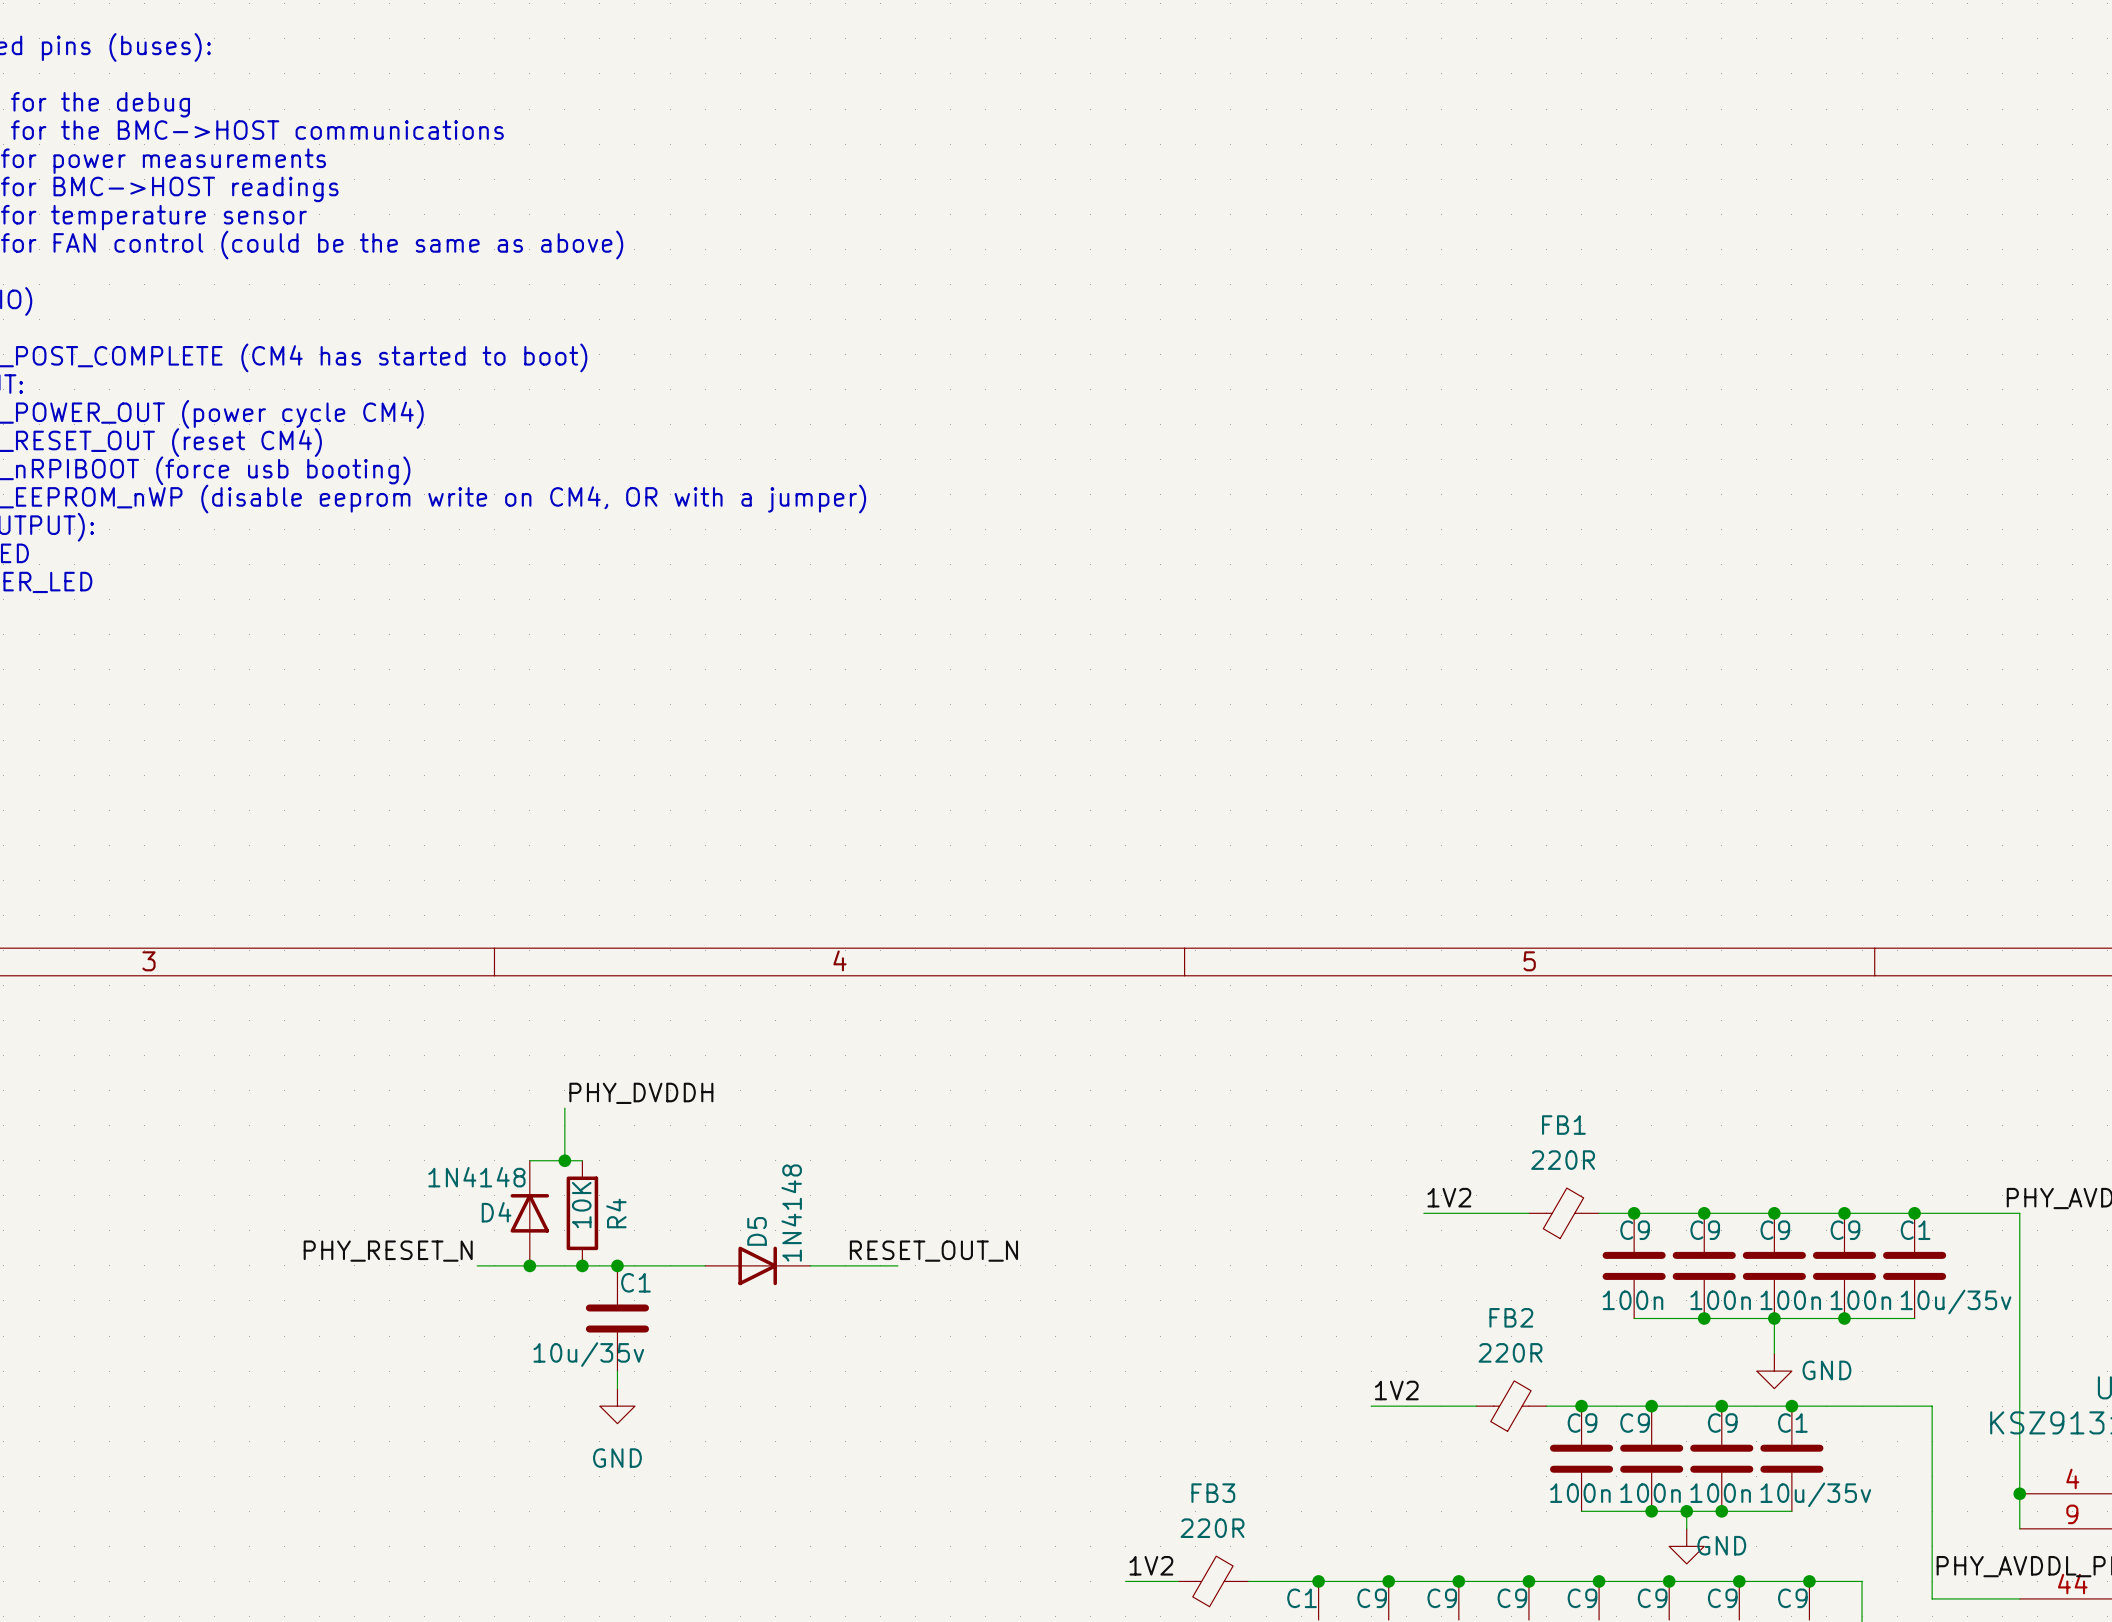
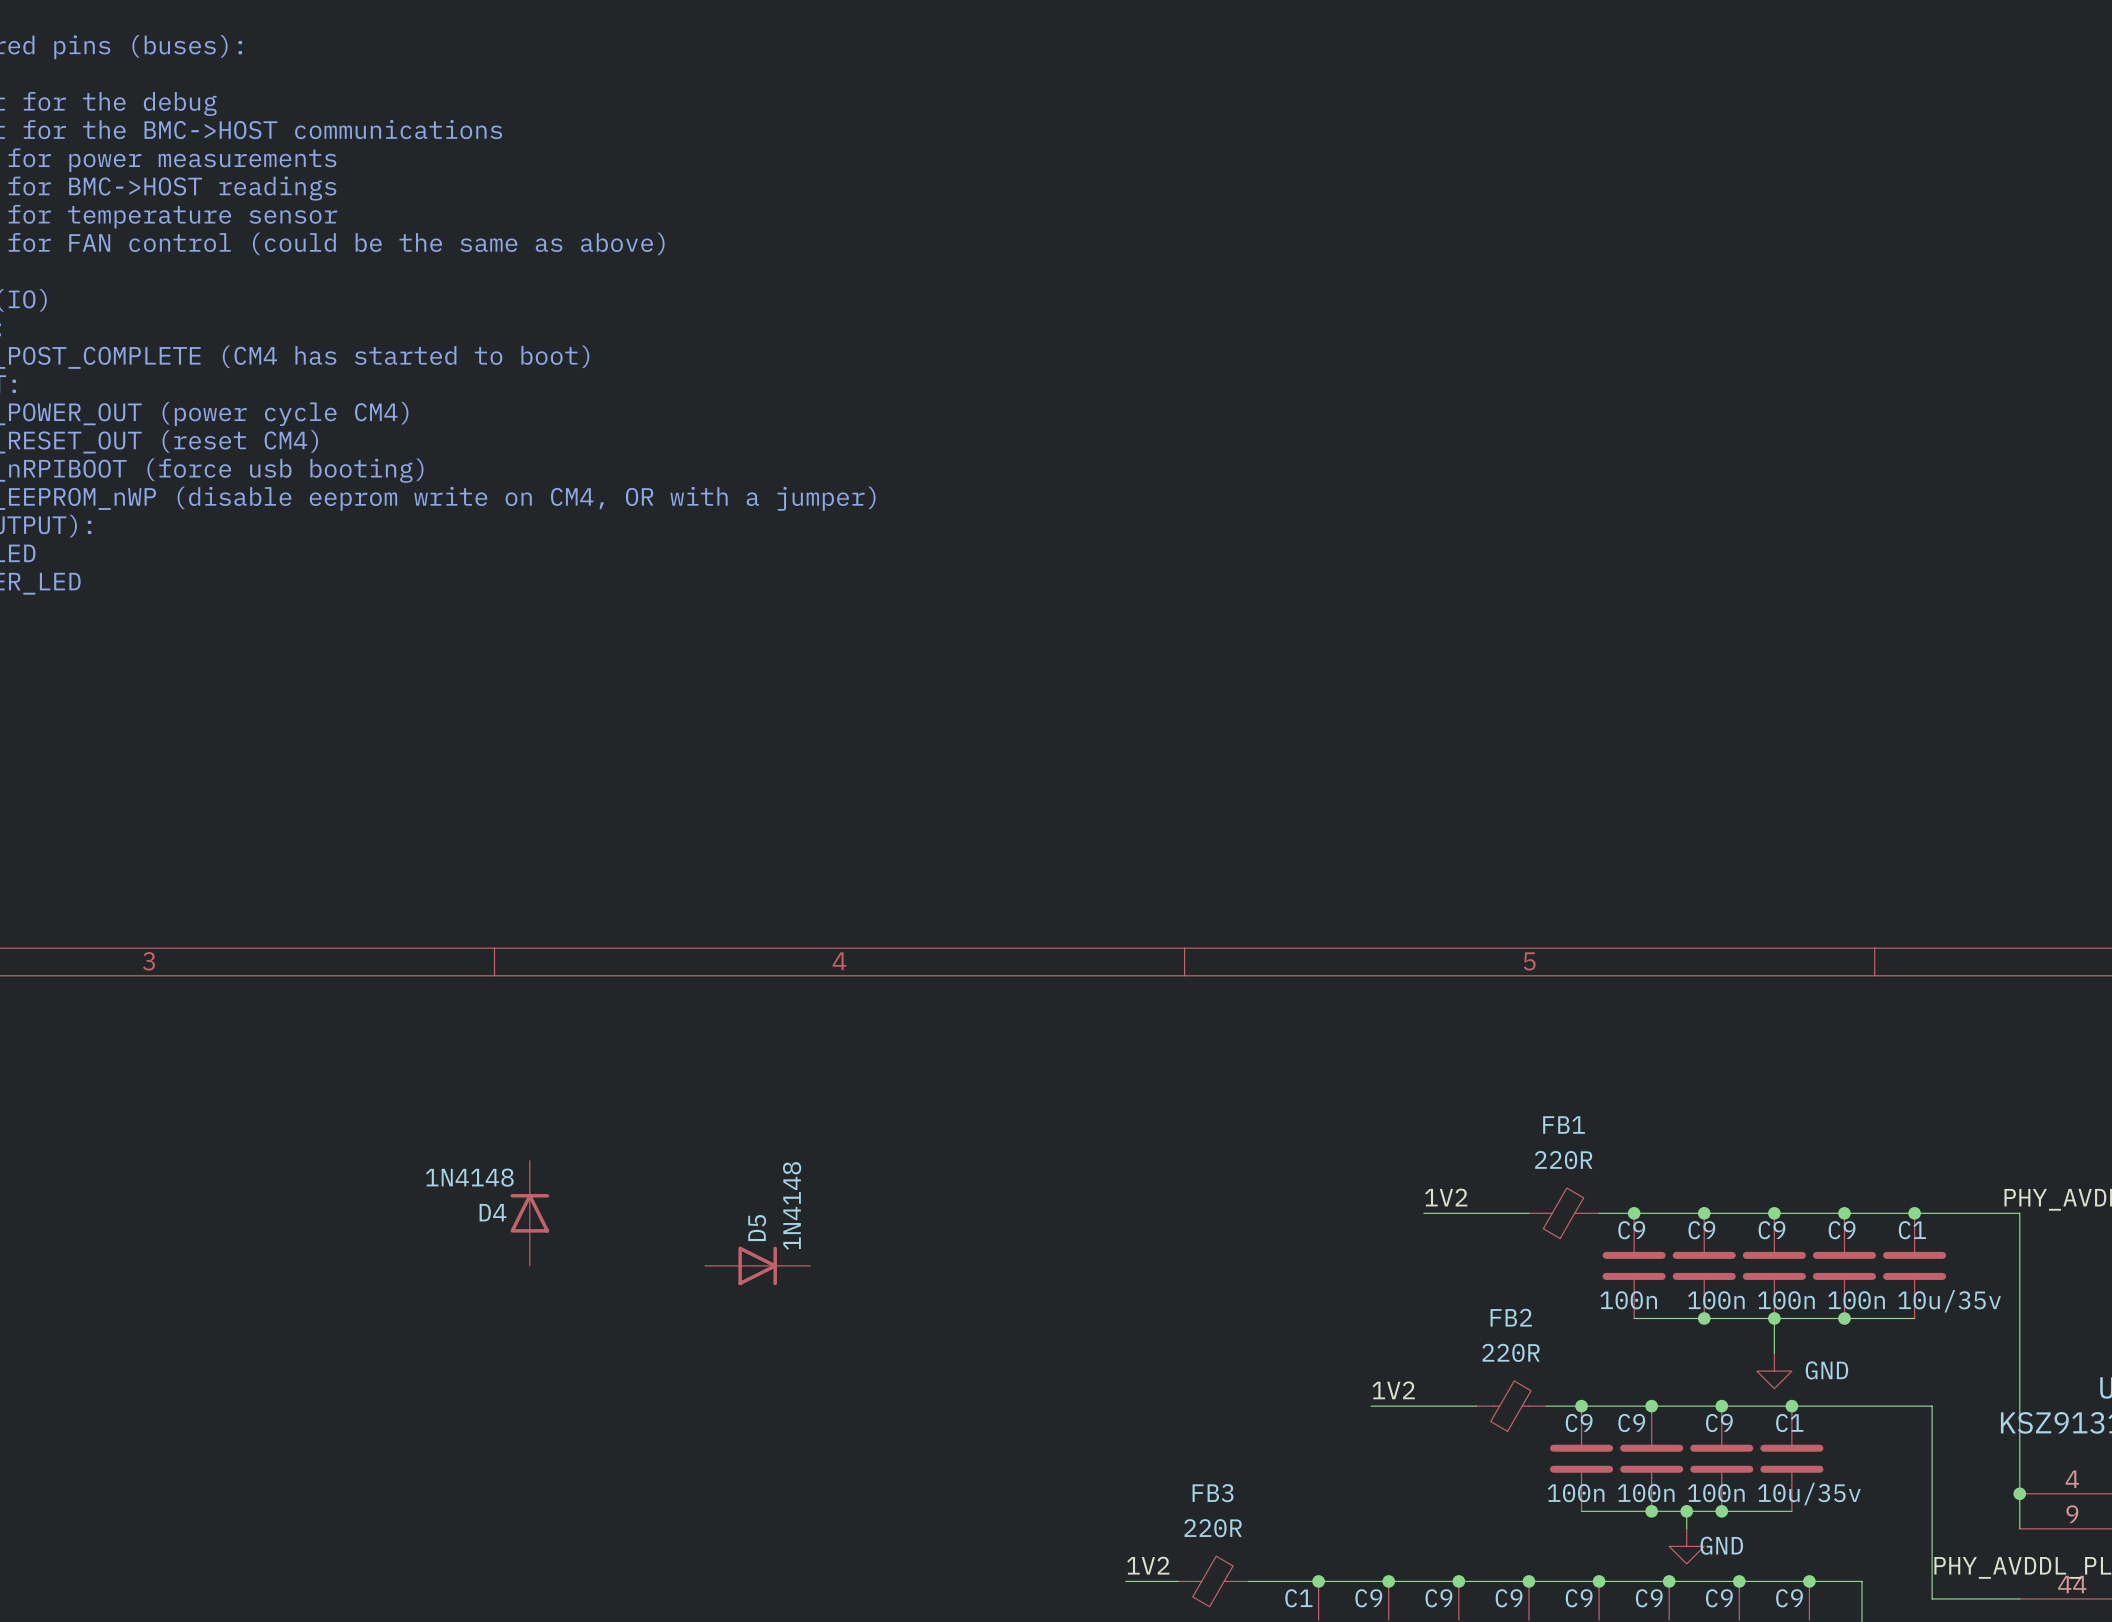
label: PHY_DVDDH (641, 1093) -> none
wire: (564, 1108) (564, 1160) -> none
wire: (529, 1160) (582, 1160) -> none
junction: (564, 1160) -> none
R4: 10K (582, 1213) -> none
label: PHY_RESET_N (388, 1251) -> none
label: RESET_OUT_N (933, 1251) -> none
wire: (477, 1265) (705, 1265) -> none
junction: (529, 1265) -> none
junction: (582, 1265) -> none
junction: (617, 1265) -> none
wire: (810, 1265) (897, 1265) -> none
C1: 10u/35v (617, 1318) -> none
wire: (617, 1371) (617, 1388) -> none
power symbol: GND (617, 1406) -> none

